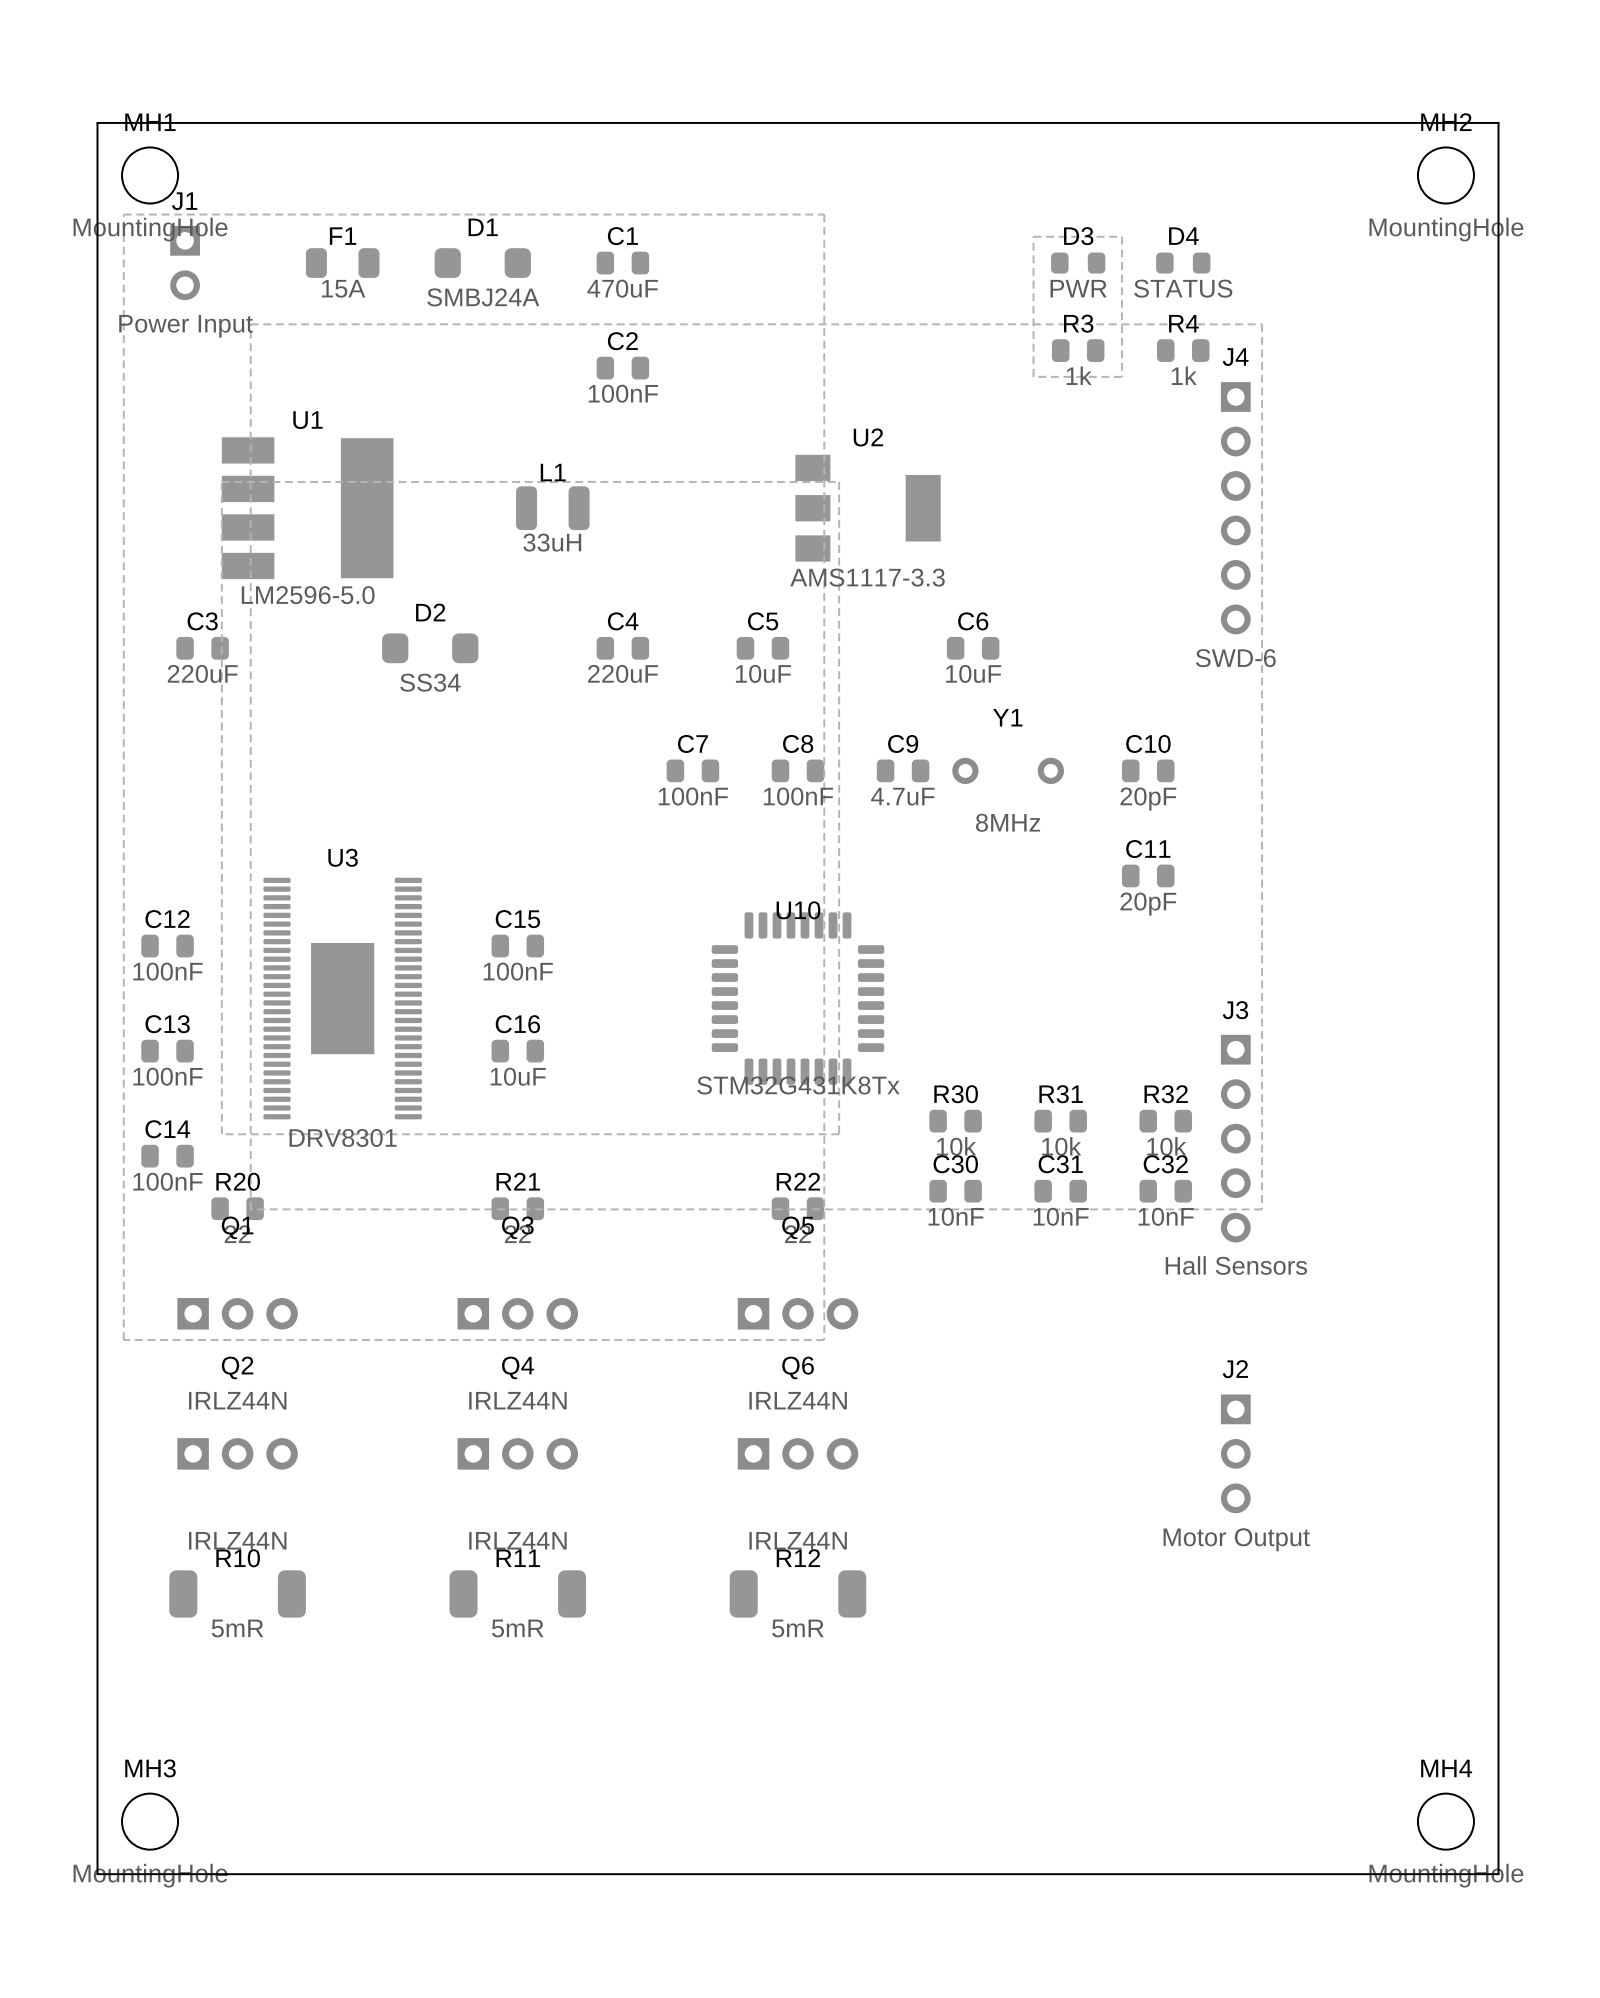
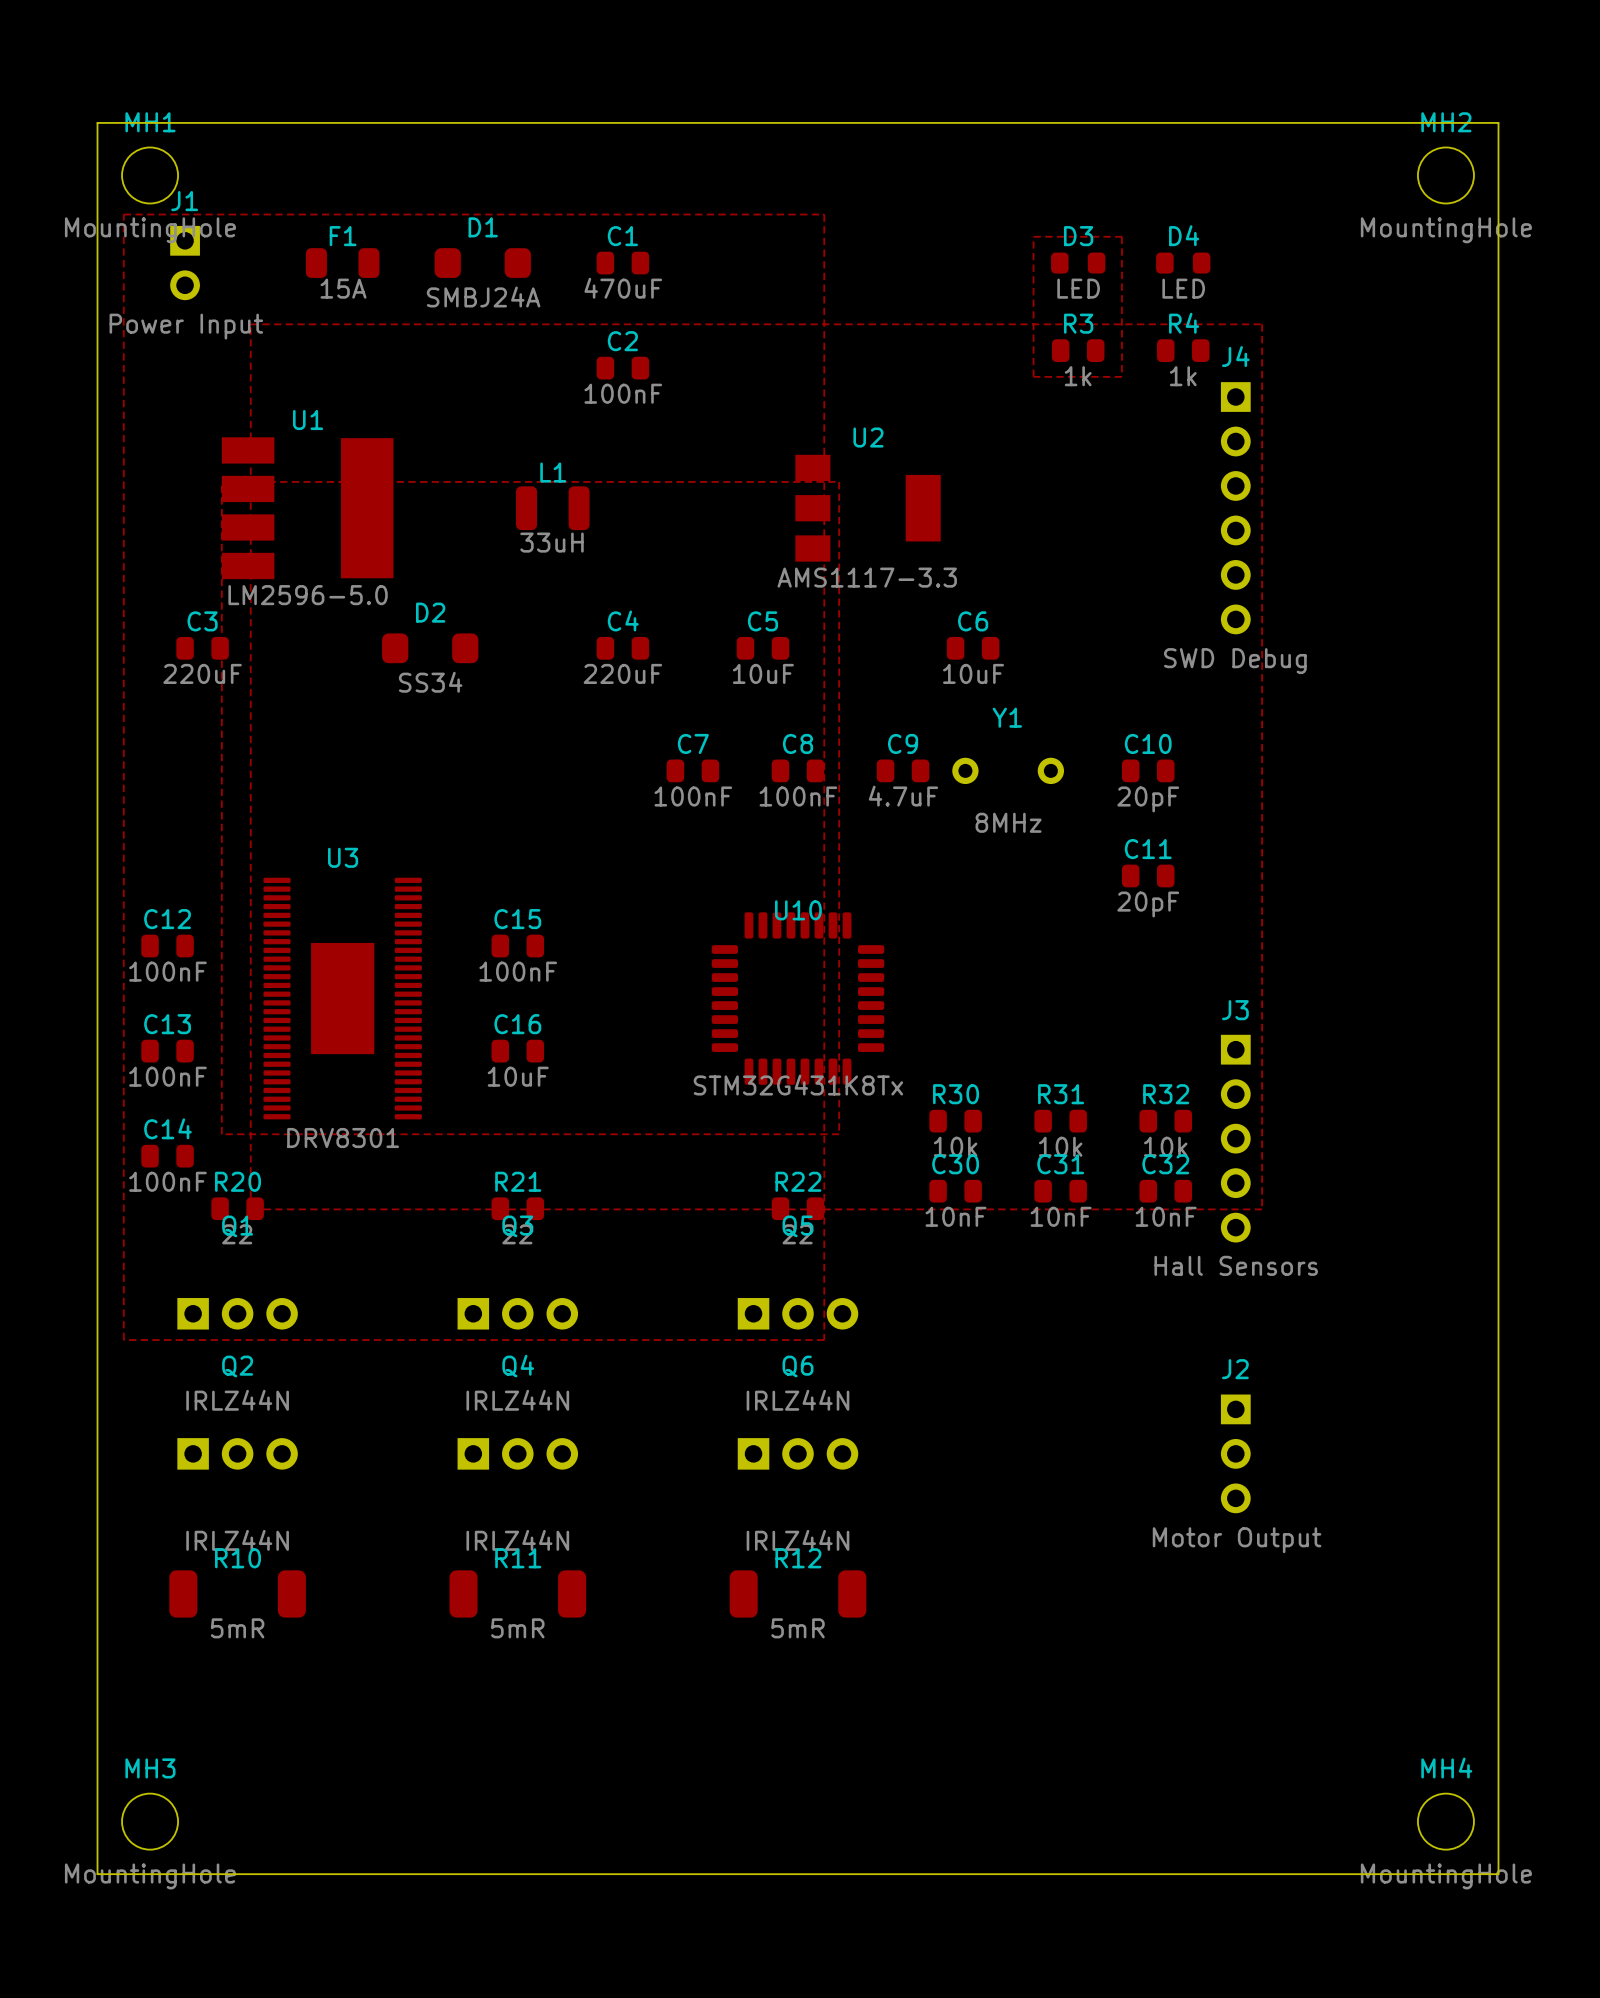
D3 value: PWR (1078, 288) -> LED (1078, 288)
D4 value: STATUS (1183, 288) -> LED (1183, 288)
J4 value: SWD-6 (1235, 658) -> SWD Debug (1235, 661)

